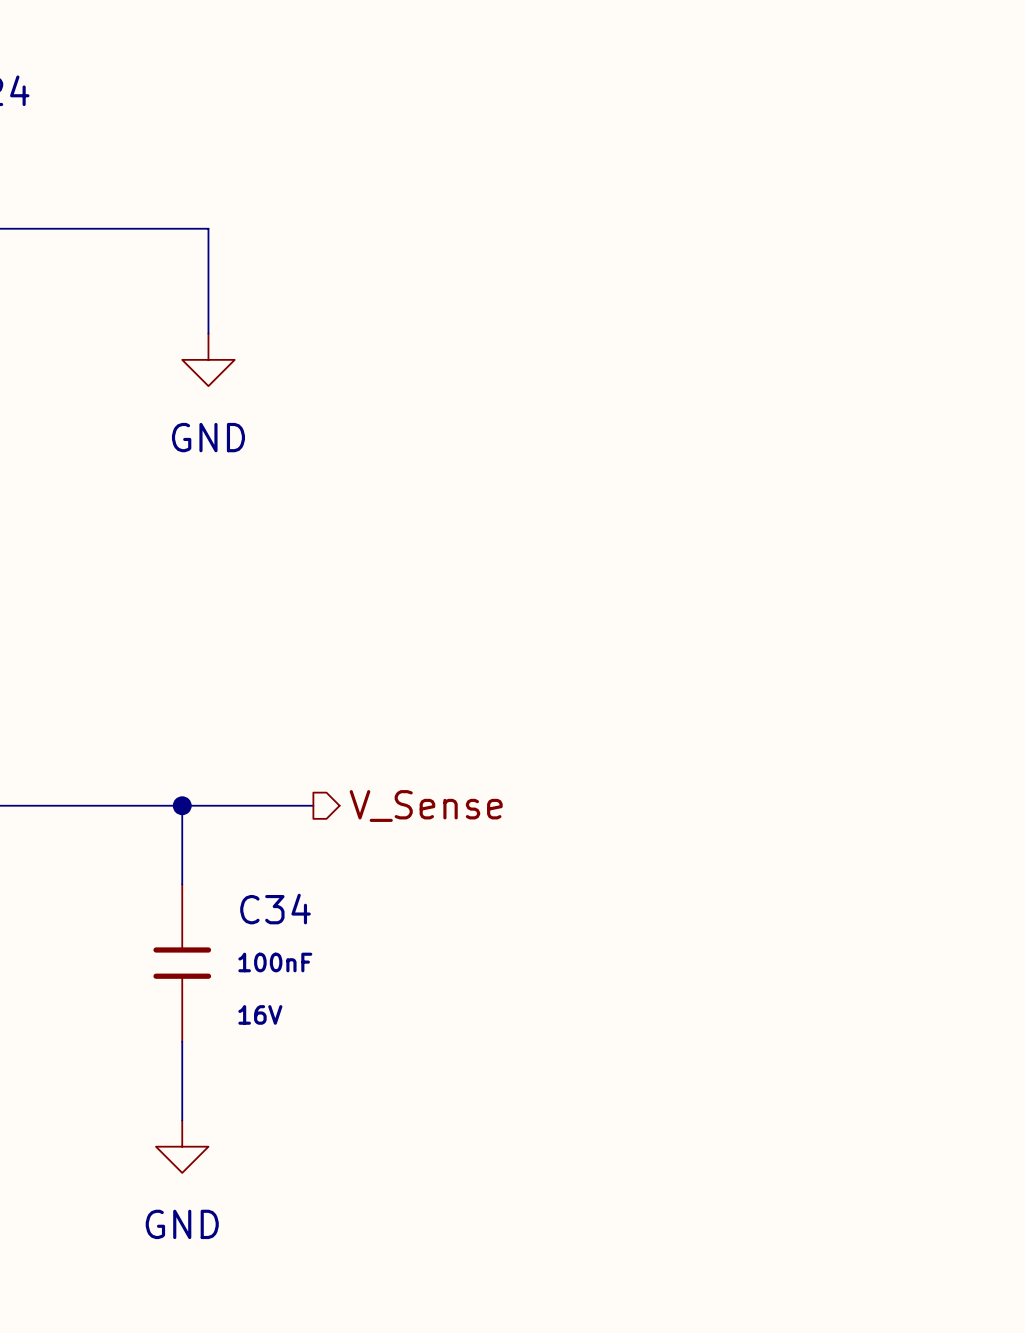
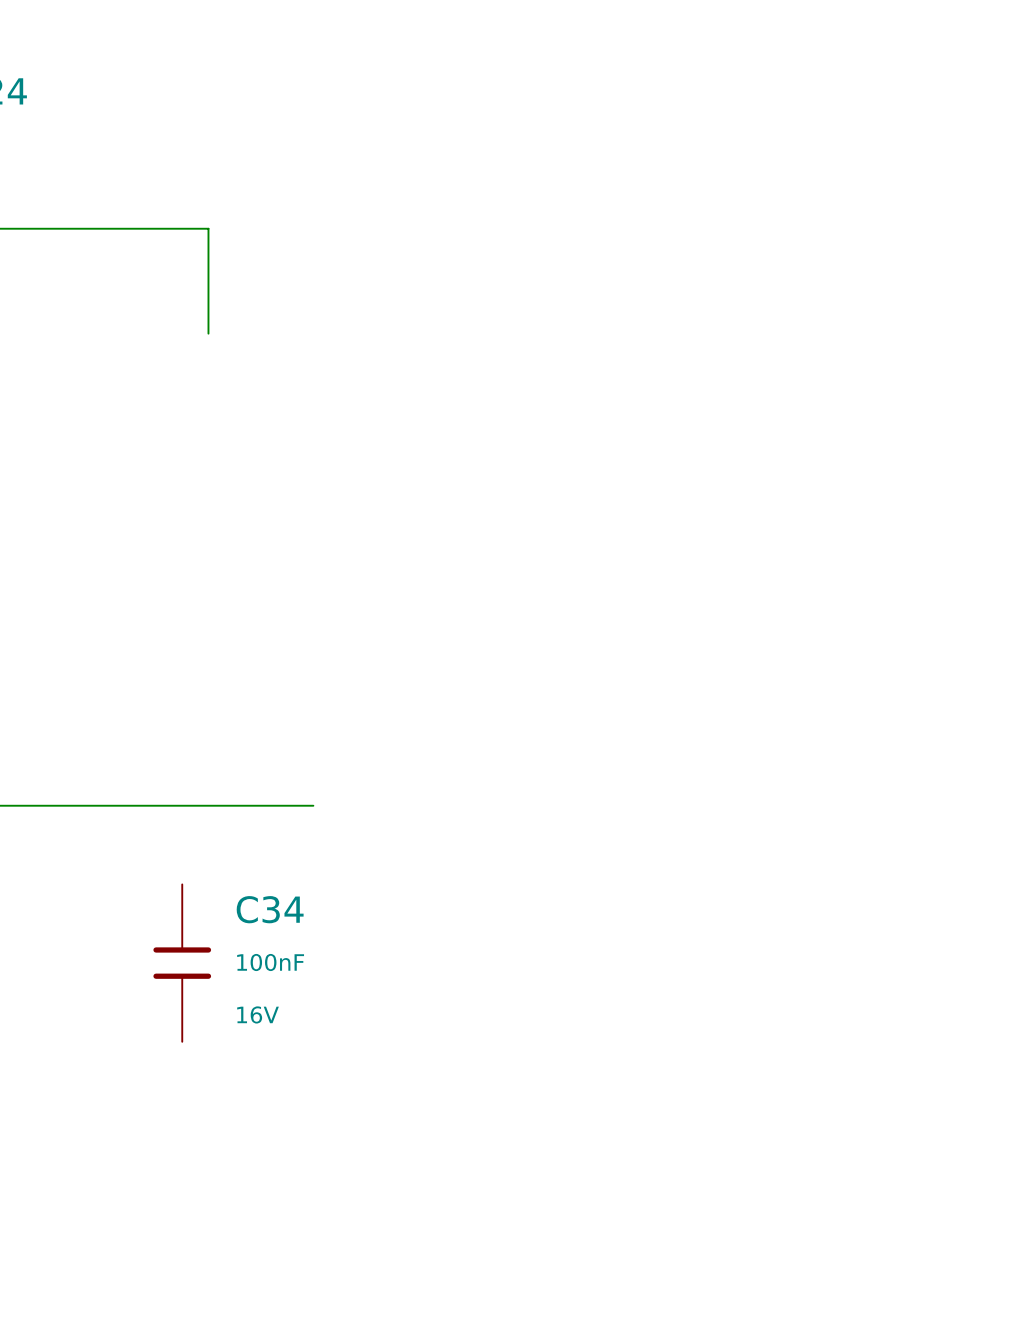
power symbol: GND (208, 359) -> none
wire: (182, 805) (182, 884) -> none
junction: (182, 805) -> none
hierarchical label: V_Sense (426, 806) -> none
wire: (182, 1041) (182, 1120) -> none
power symbol: GND (182, 1146) -> none

